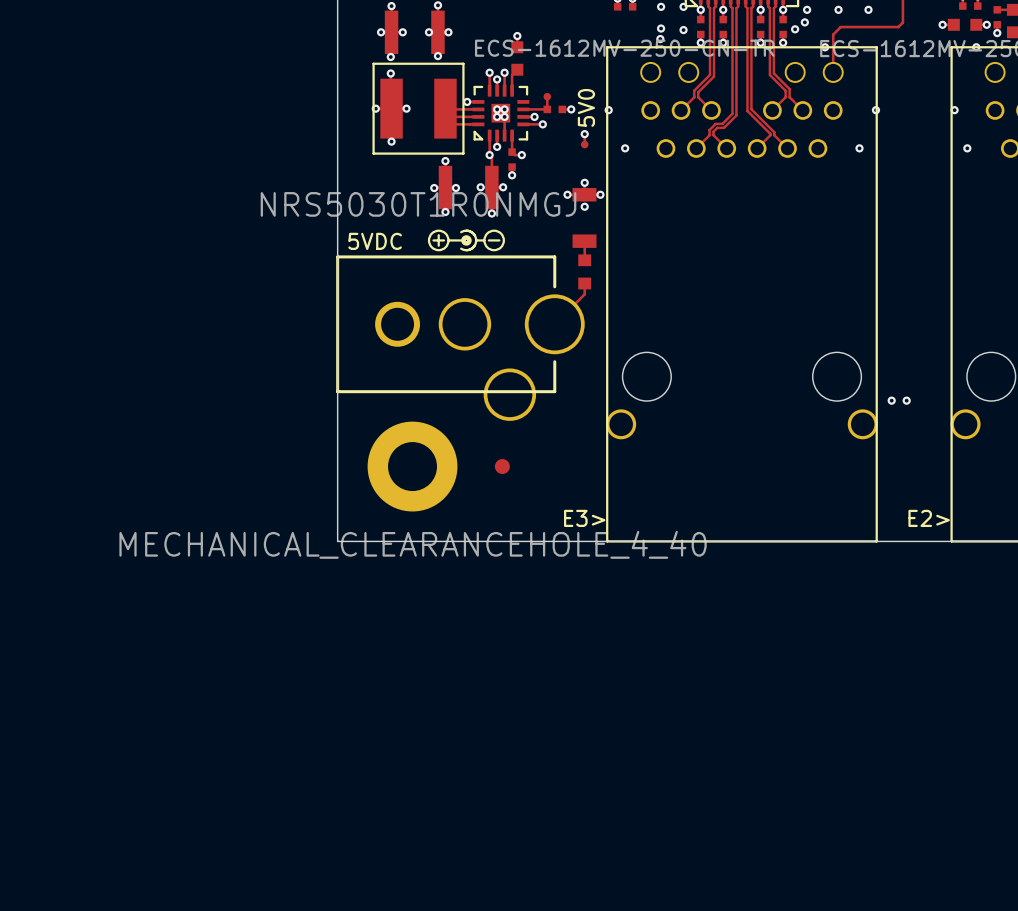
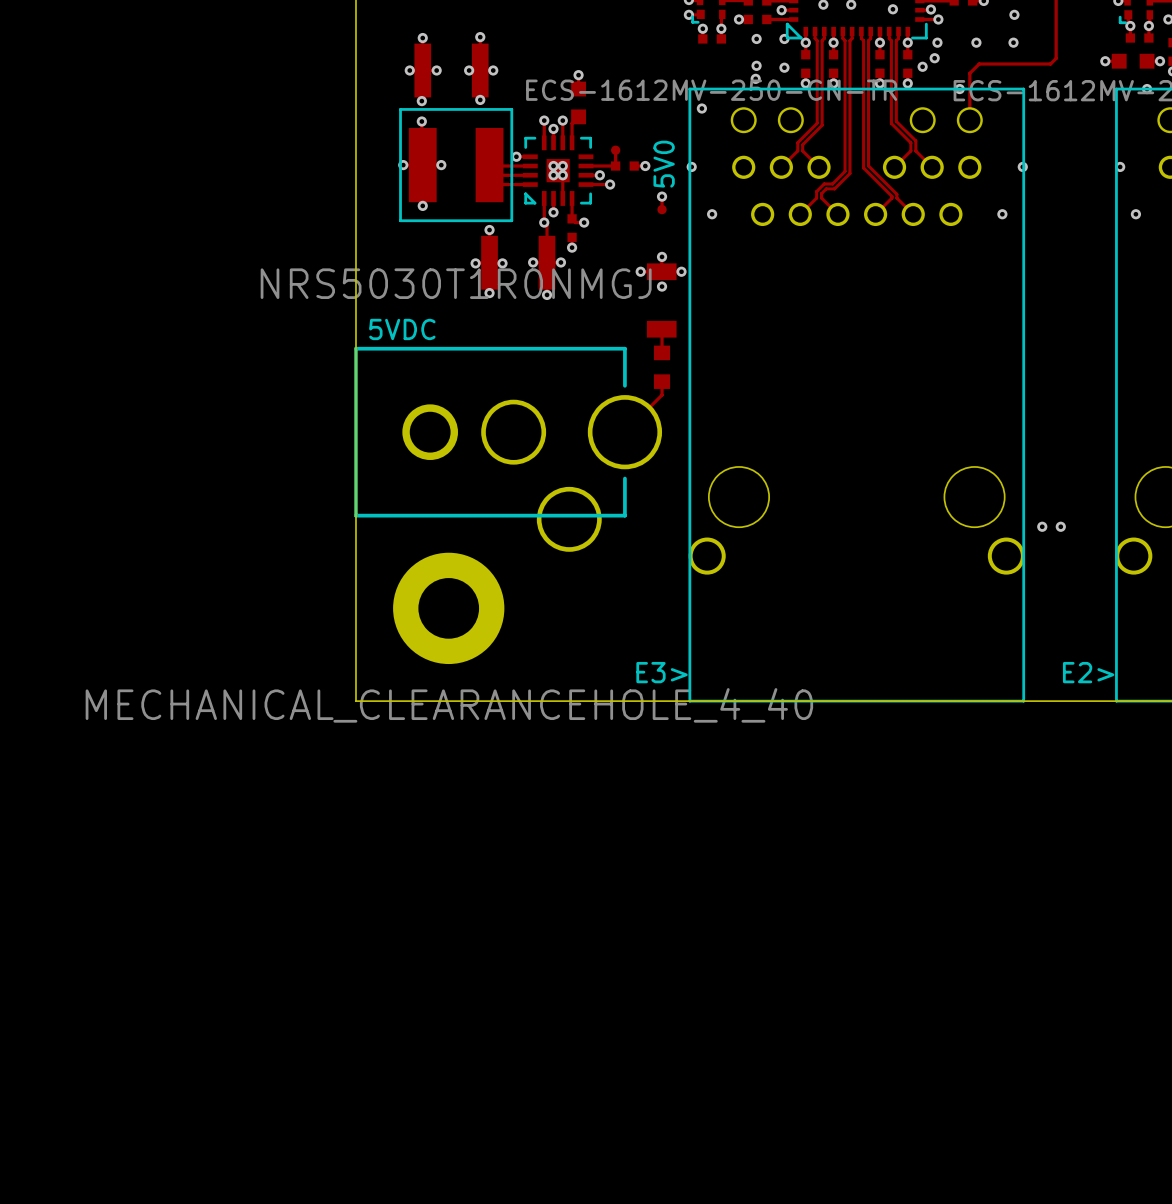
via: none -> (701, 108)
drawing: [427, 229, 505, 252] -> none
part: (502, 466) -> none

